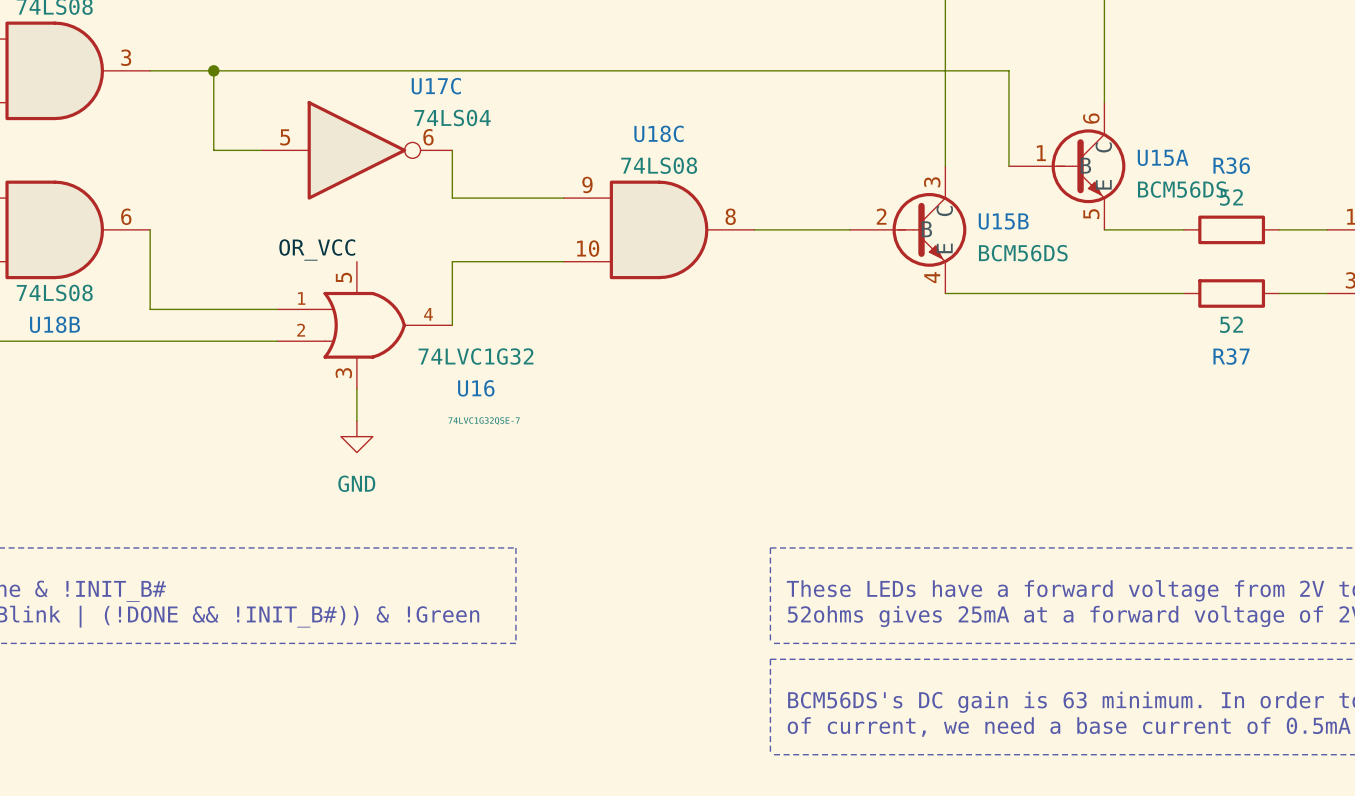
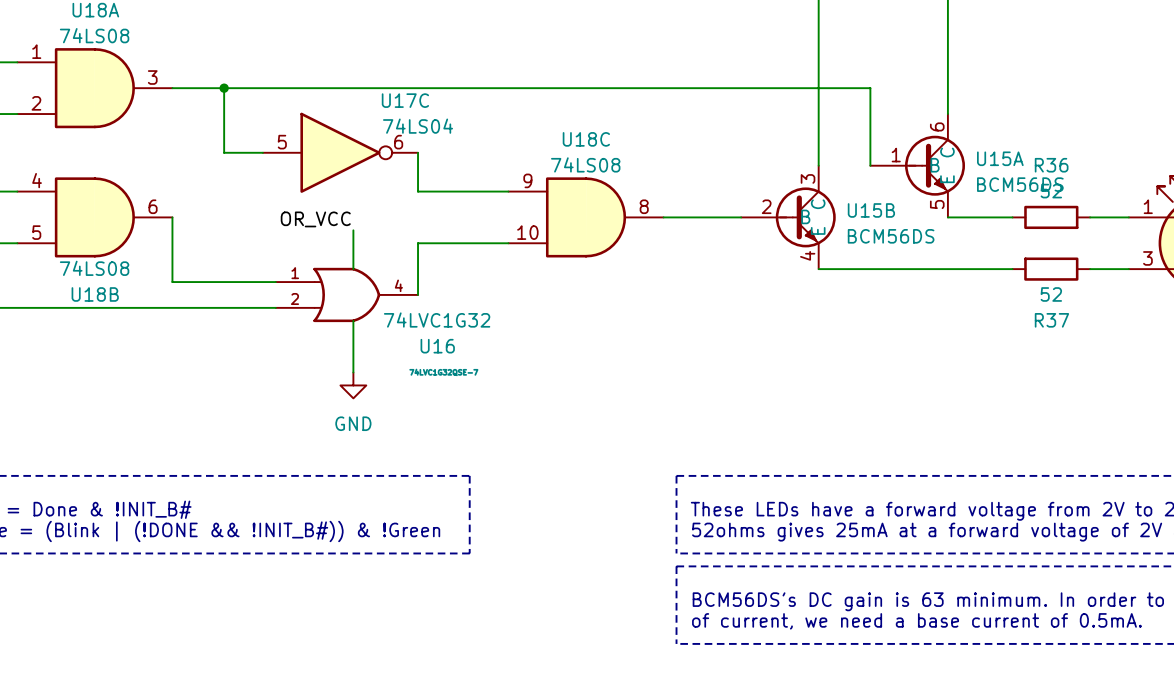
wire: none -> (353, 230) (353, 269)
label position: OR_VCC (317, 249) -> OR_VCC (315, 219)
U16 symbol: [277, 261, 453, 389] -> [275, 267, 419, 323]
wire: none -> (353, 320) (353, 372)
wire: (356, 388) (356, 420) -> none
power symbol position: GND (356, 436) -> GND (353, 385)

